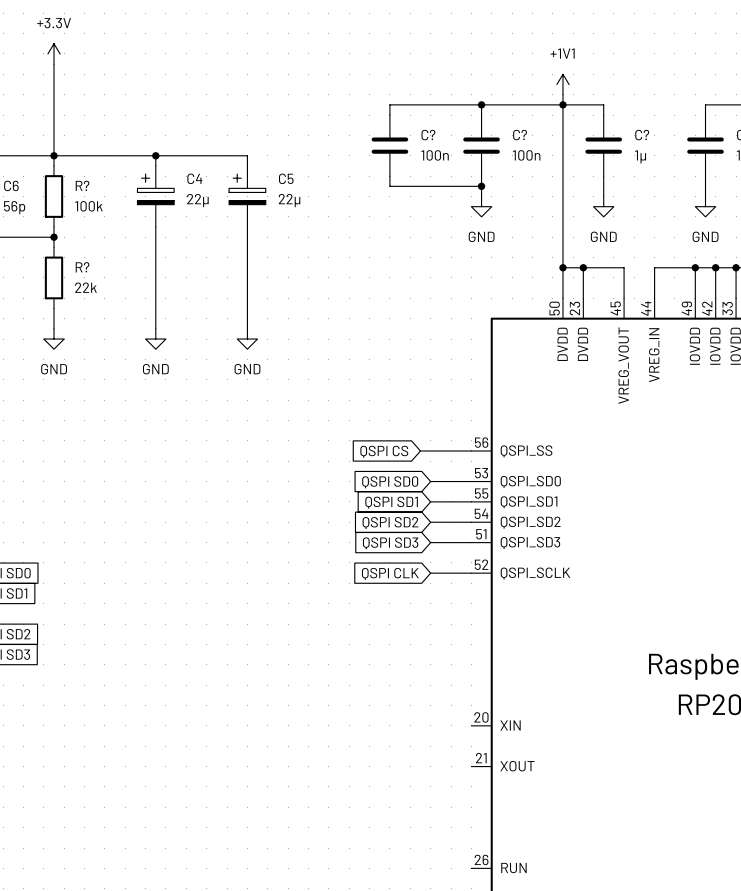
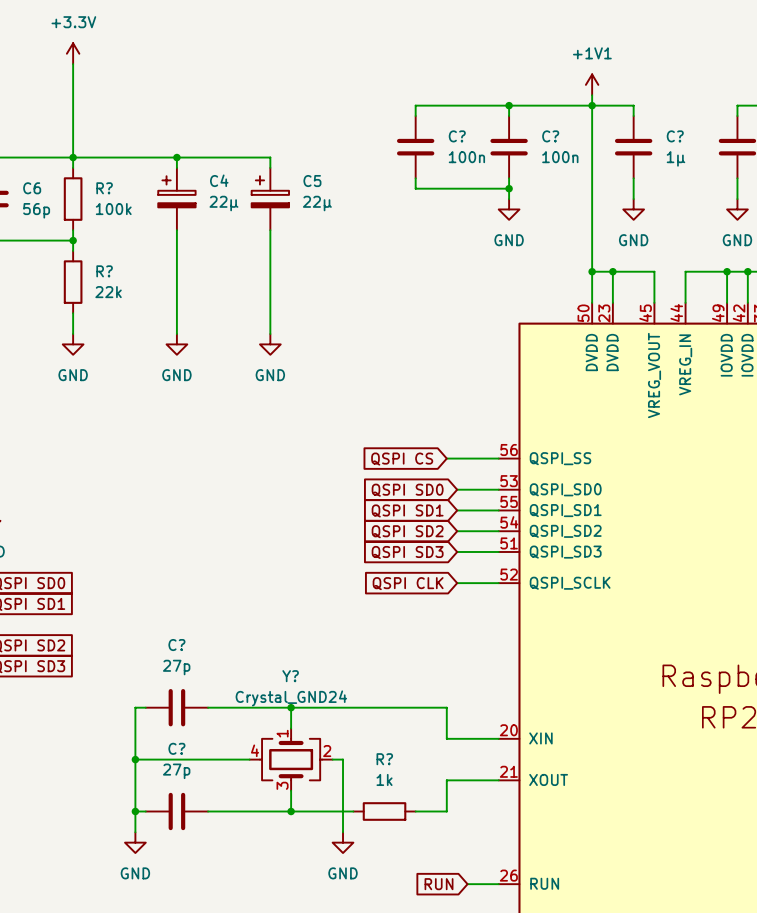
wire: none -> (145, 707) (135, 707) (135, 832)
C?: none -> 27p (176, 707)
wire: none -> (208, 707) (446, 707) (446, 738) (498, 738)
wire: none -> (291, 707) (291, 728)
junction: none -> (291, 707)
wire: none -> (135, 759) (249, 759)
junction: none -> (135, 759)
Y?: none -> Crystal_GND24 (291, 759)
wire: none -> (332, 759) (343, 759) (343, 832)
wire: none -> (498, 780) (446, 780) (446, 811) (415, 811)
wire: none -> (291, 790) (291, 811)
wire: none -> (135, 811) (145, 811)
junction: none -> (135, 811)
C?: none -> 27p (176, 811)
wire: none -> (208, 811) (353, 811)
junction: none -> (291, 811)
R?: none -> 1k (384, 811)
power symbol: none -> GND (135, 842)
power symbol: none -> GND (343, 842)
global label: none -> RUN (439, 884)
wire: none -> (467, 884) (498, 884)

